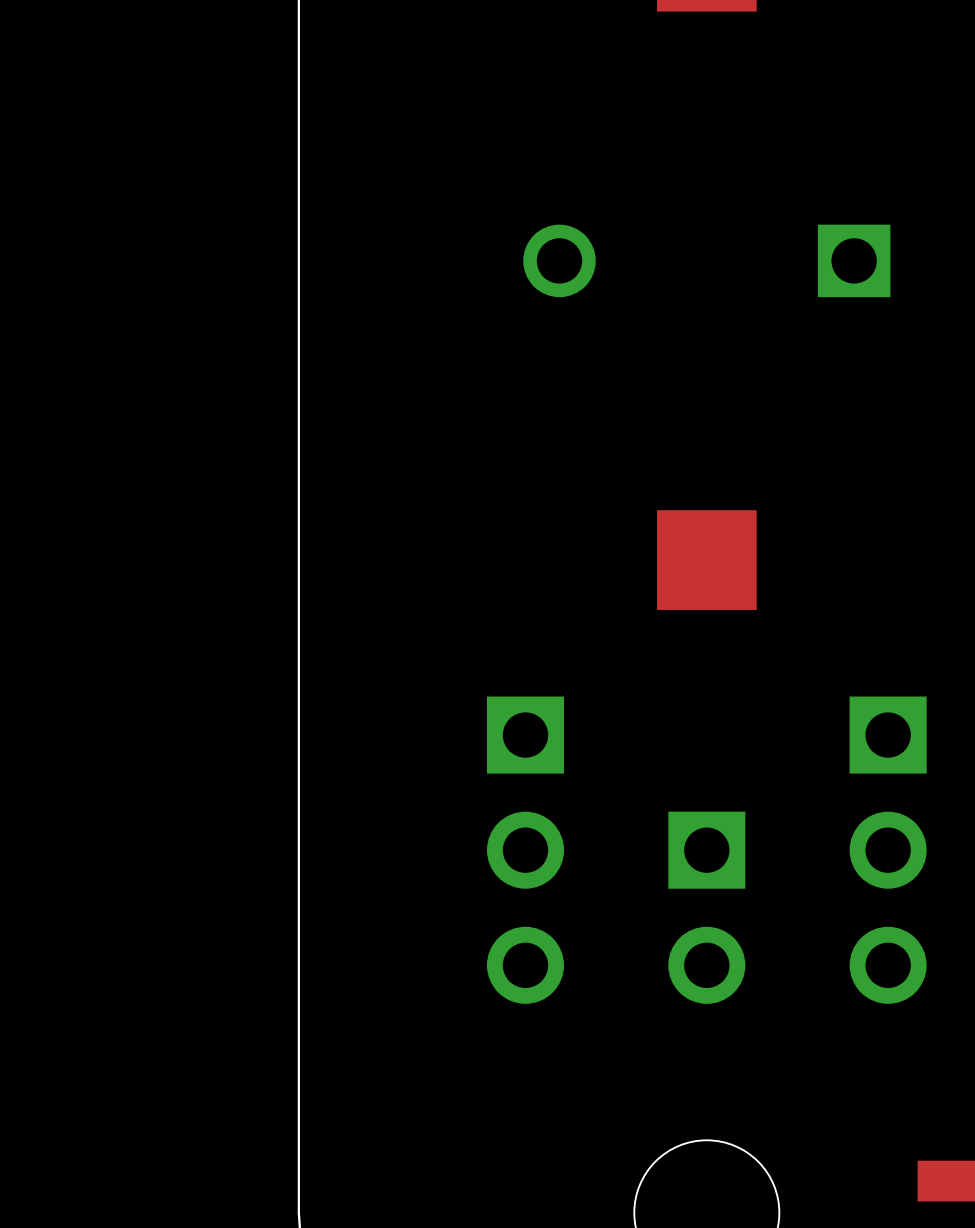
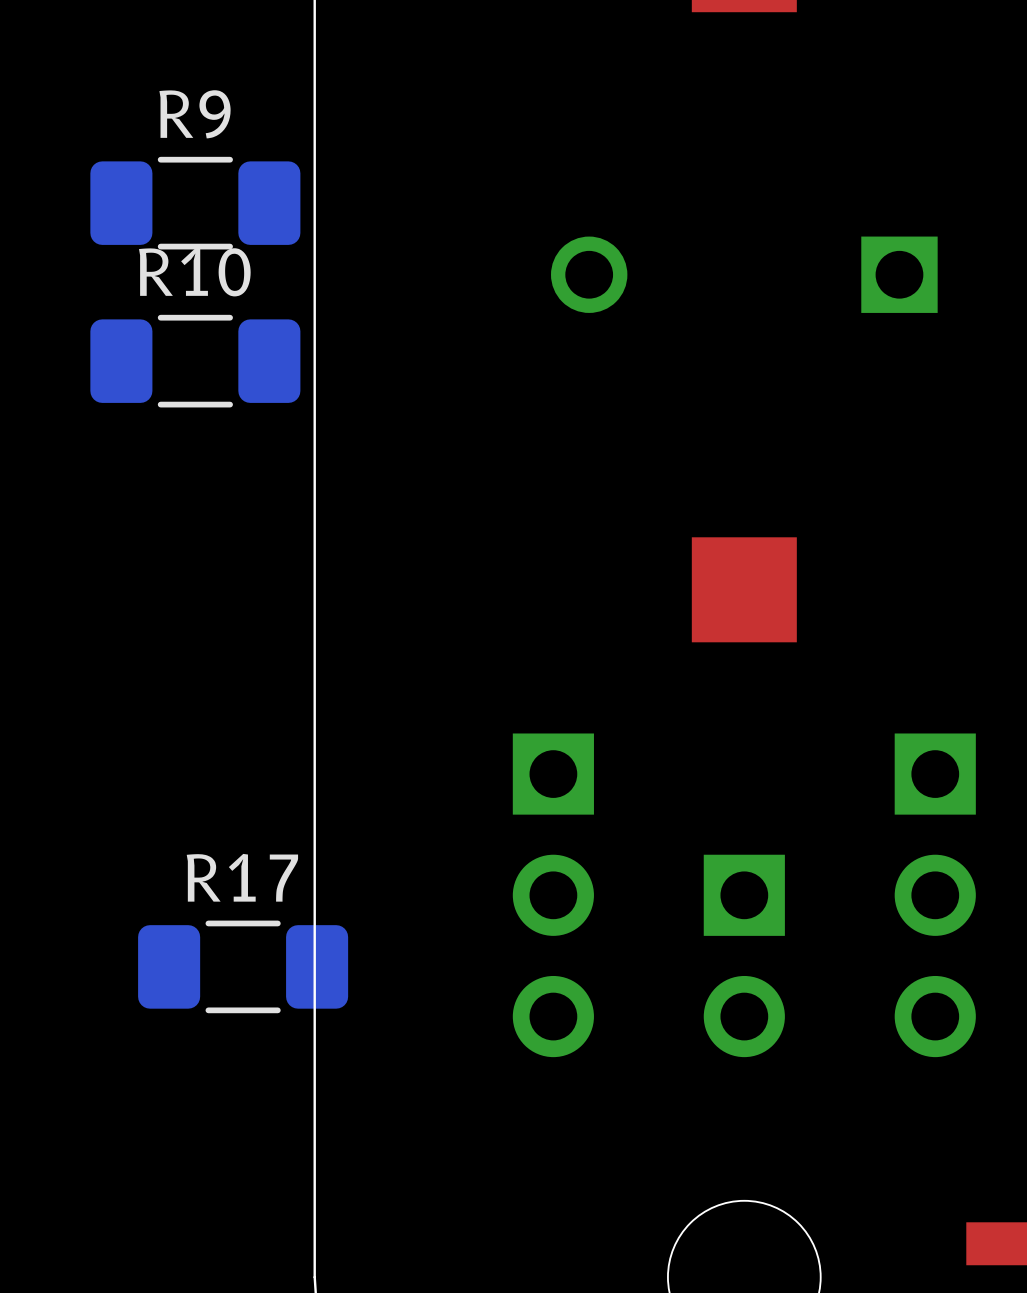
R9: none -> (195, 203)
R10: none -> (195, 361)
R17: none -> (243, 966)

